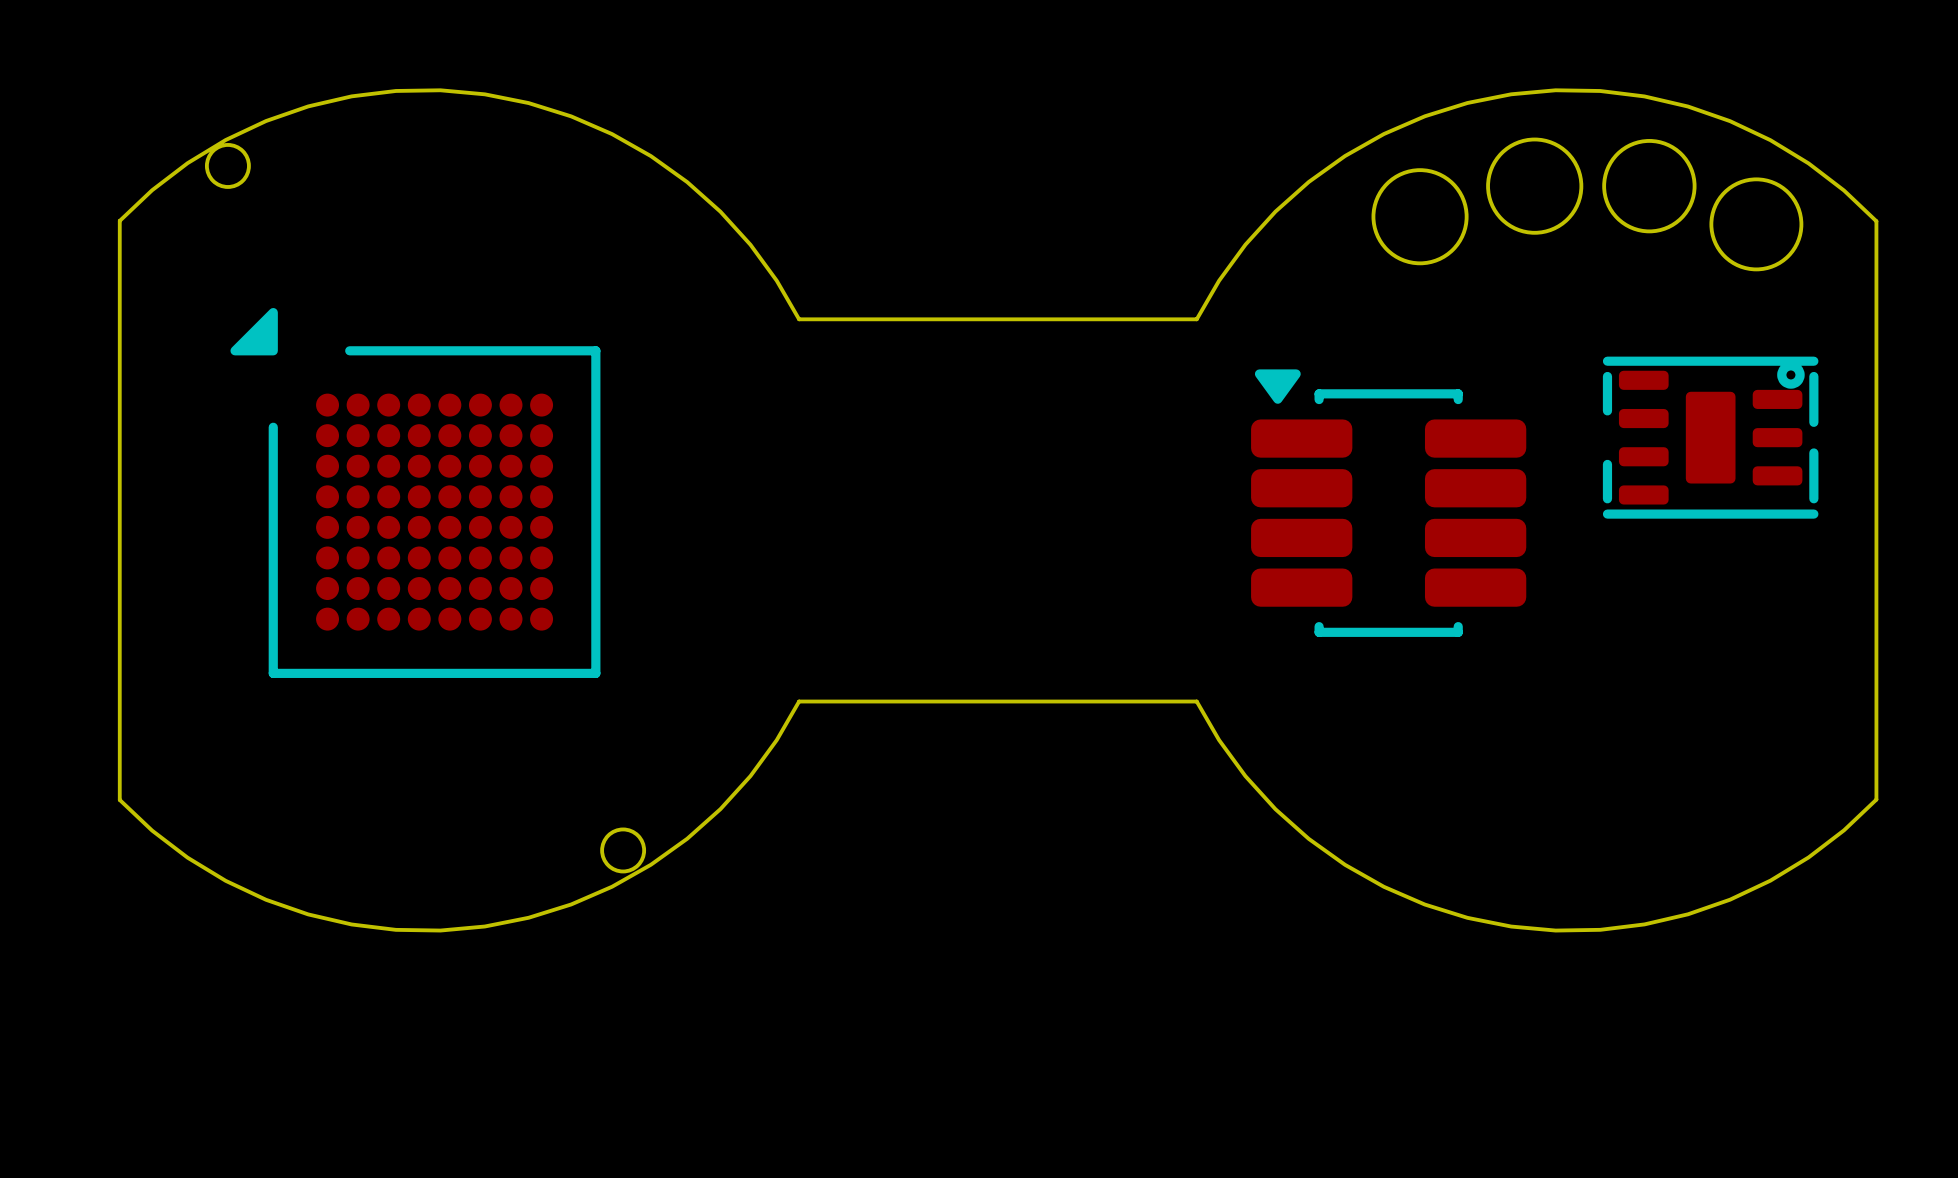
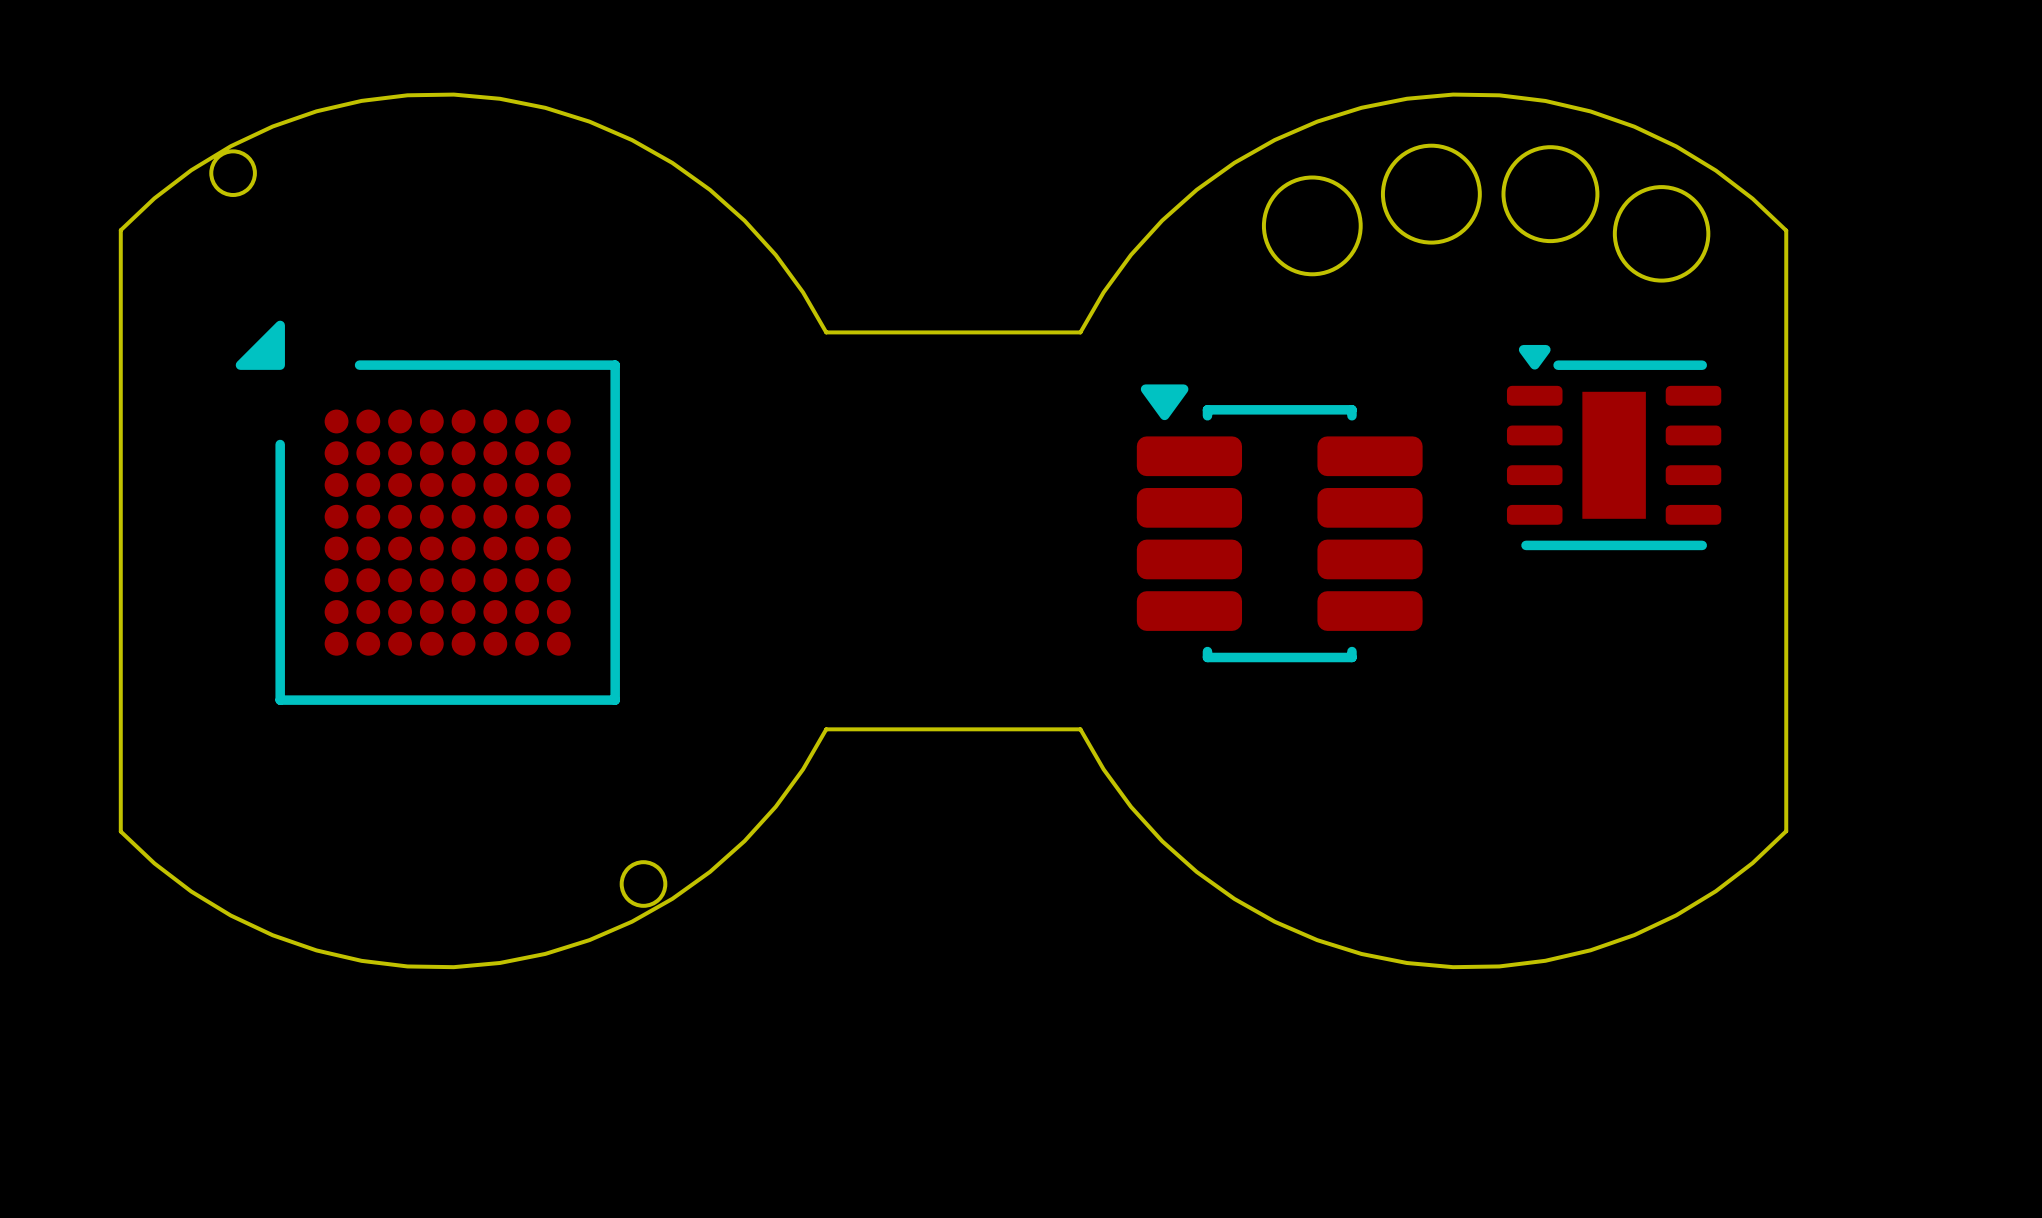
round board edge: none -> [1261, 175, 1363, 277]
round board edge: [1709, 177, 1804, 272] -> none
round board edge position: (1534, 186) -> (1550, 194)
round board edge position: (1649, 186) -> (1661, 233)
round board edge position: (1420, 216) -> (1431, 194)
board edge: (1043, 319) (1196, 319) (1219, 280) (1245, 244) (1275, 211) (1308, 181) (1345, 156) (1383, 134) (1424, 116) (1467, 103) (1511, 94) (1555, 90) (1600, 90) (1644, 96) (1688, 106) (1730, 121) (1770, 140) (1808, 163) (1844, 190) (1876, 221) (1876, 799) (1844, 830) (1808, 857) (1770, 880) (1730, 899) (1688, 914) (1644, 924) (1600, 929) (1555, 930) (1511, 926) (1467, 917) (1424, 904) (1383, 886) (1345, 864) (1308, 838) (1275, 809) (1245, 776) (1219, 740) (1196, 701) (1043, 701) -> (1080, 332) (1103, 292) (1131, 254) (1162, 220) (1196, 189) (1234, 162) (1274, 140) (1317, 121) (1361, 107) (1406, 98) (1453, 94) (1499, 95) (1545, 100) (1590, 111) (1634, 126) (1676, 146) (1715, 170) (1752, 198) (1786, 230) (1786, 831) (1752, 863) (1715, 891) (1676, 915) (1634, 935) (1590, 950) (1545, 960) (1499, 966) (1453, 967) (1406, 963) (1361, 953) (1317, 940) (1274, 921) (1234, 898) (1196, 871) (1162, 841) (1131, 806) (1103, 769) (1080, 729)
part: none -> (1614, 447)
part: (1710, 437) -> none
part position: (1388, 503) -> (1279, 523)

